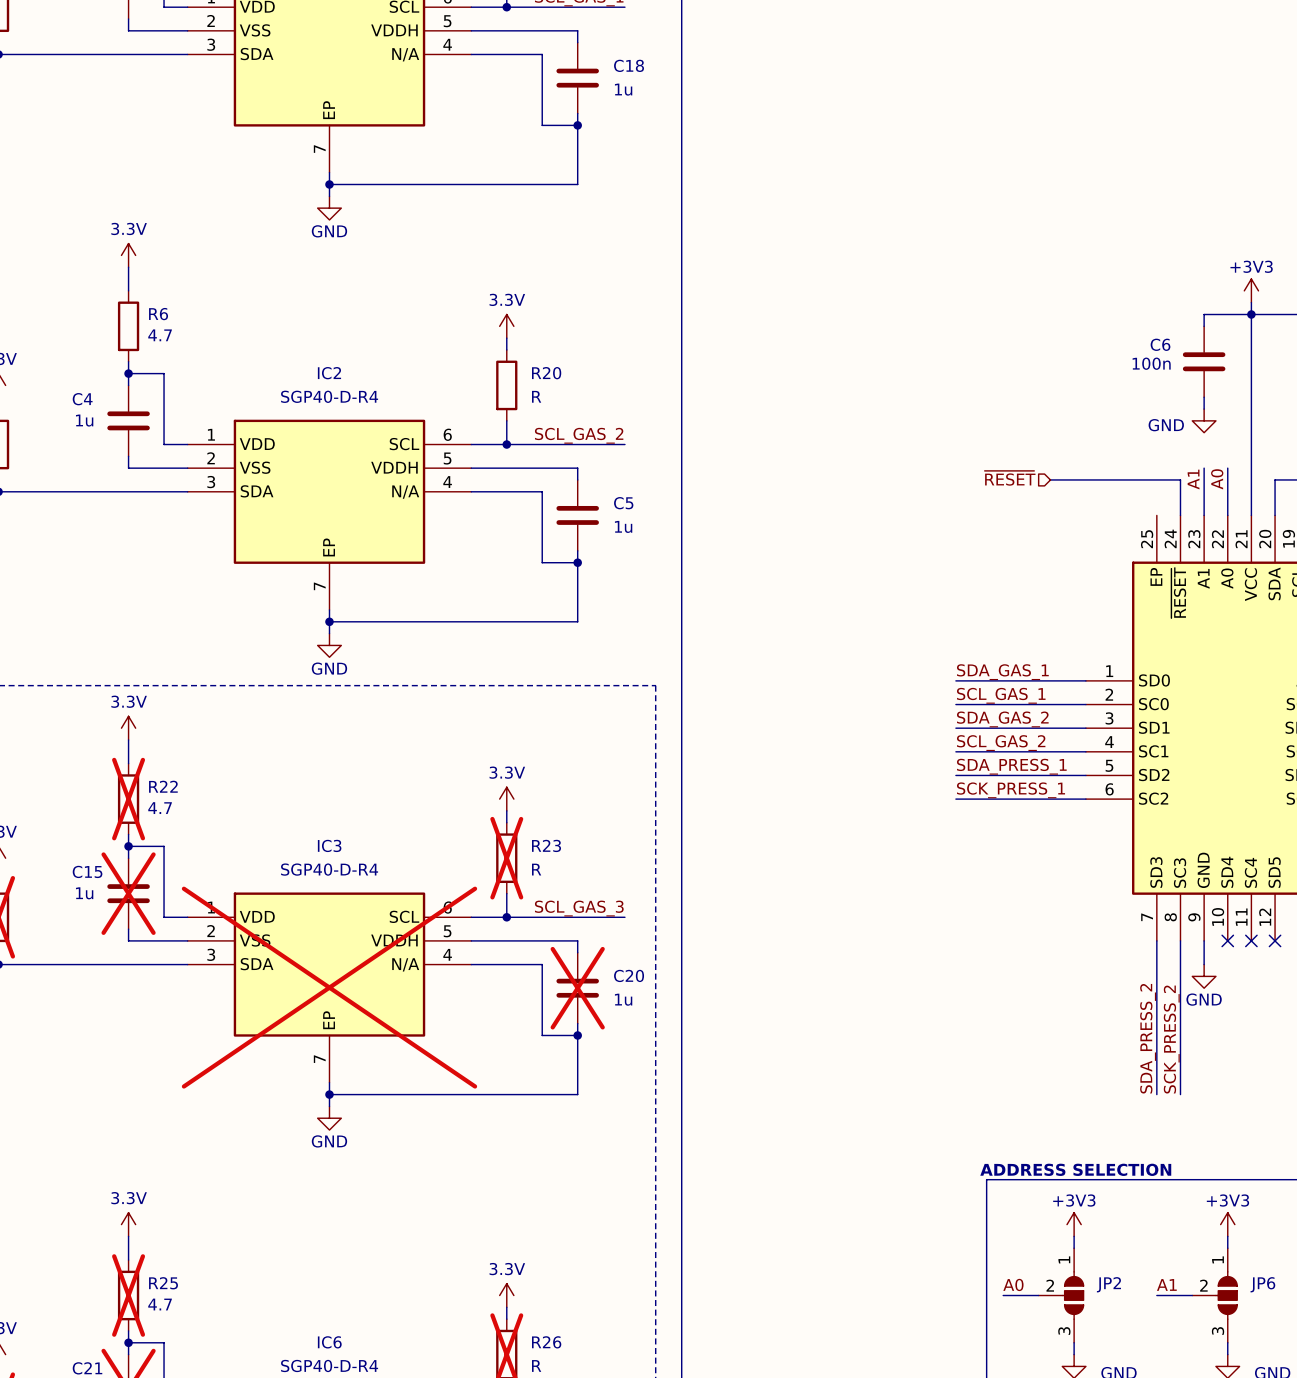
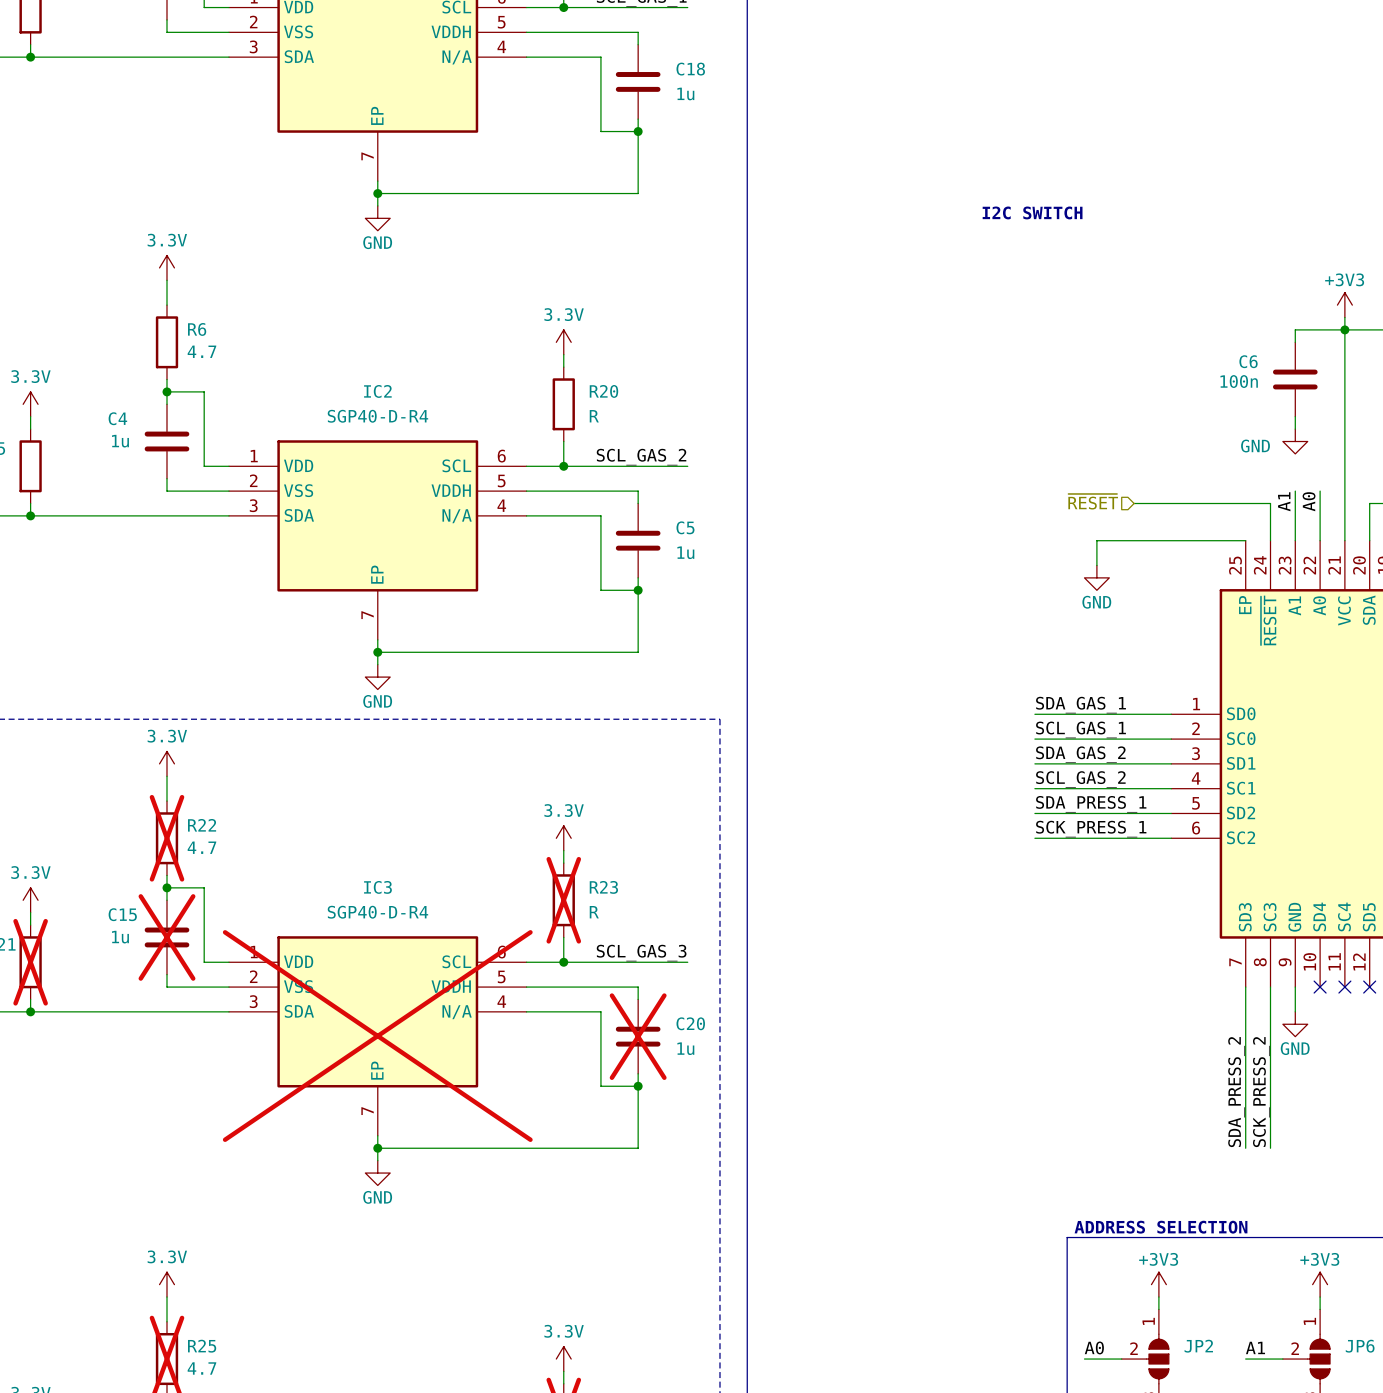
text: none -> I2C SWITCH (1032, 212)
wire: none -> (1245, 540) (1096, 540) (1096, 565)
power symbol: none -> GND (1096, 577)

